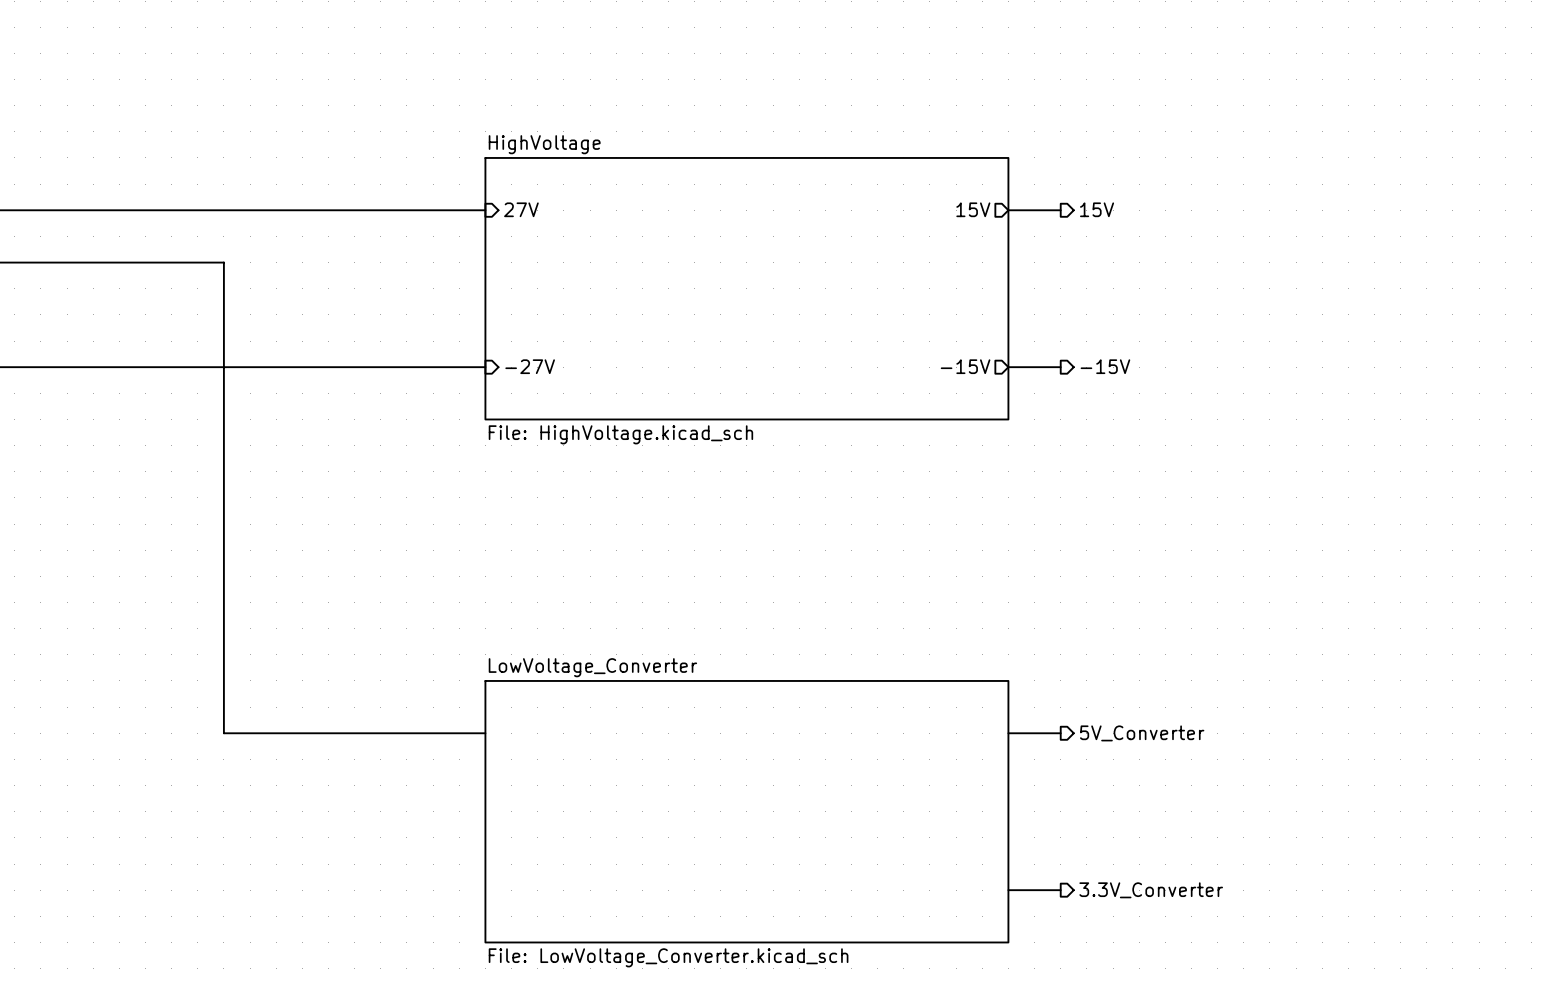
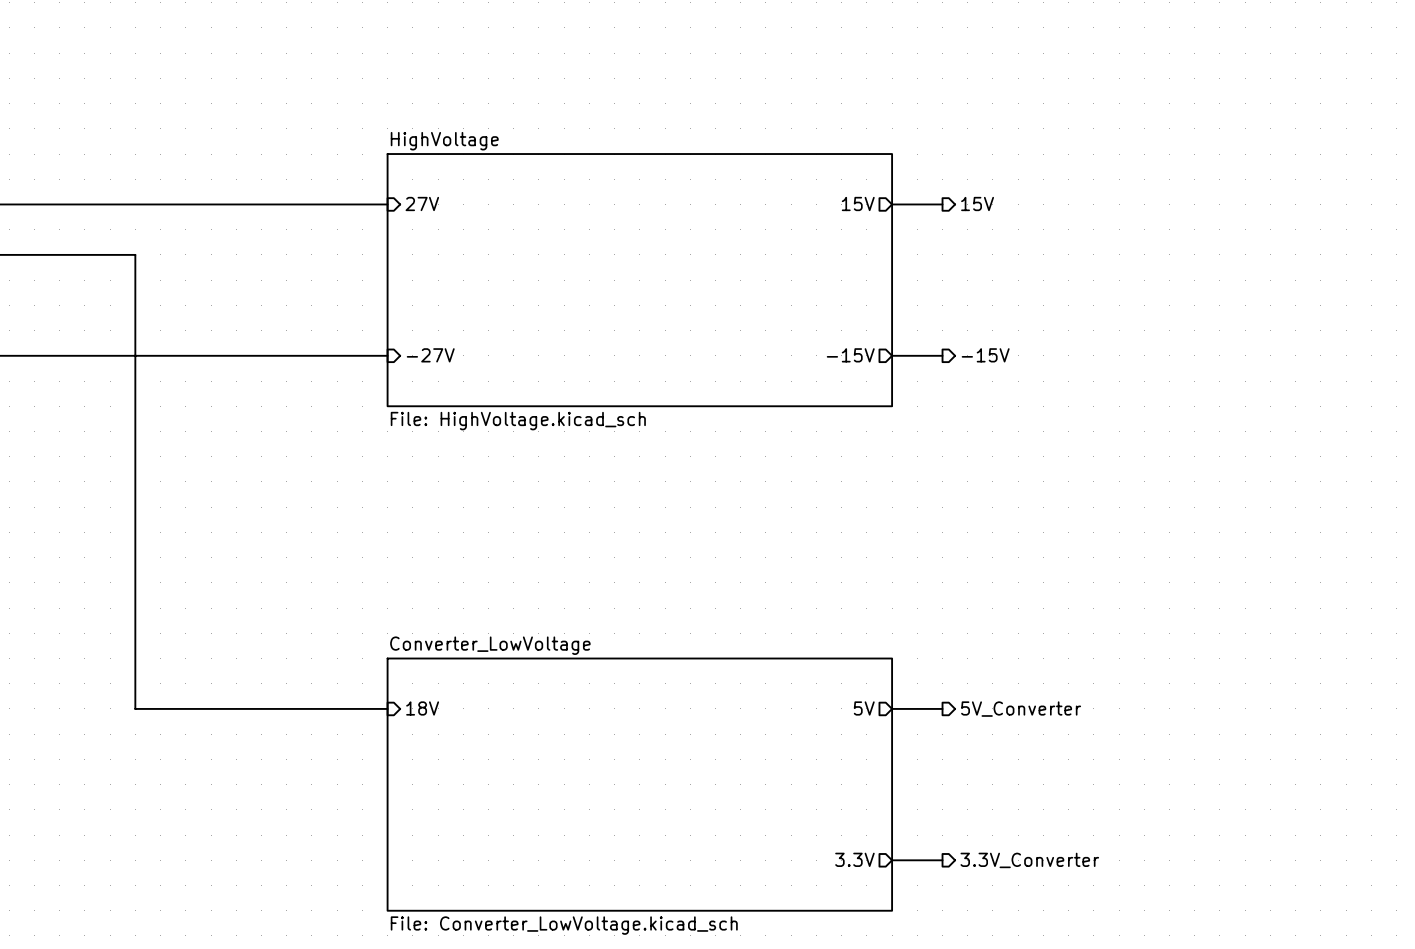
sheet LowVoltage_Converter name: LowVoltage_Converter (592, 667) -> Converter_LowVoltage (490, 645)
sheet pin: none -> 18V (422, 708)
sheet pin: none -> 5V (864, 708)
sheet pin: none -> 3.3V (854, 859)
sheet LowVoltage_Converter value: File: LowVoltage_Converter.kicad_sch (668, 957) -> File: Converter_LowVoltage.kicad_sch (564, 925)

